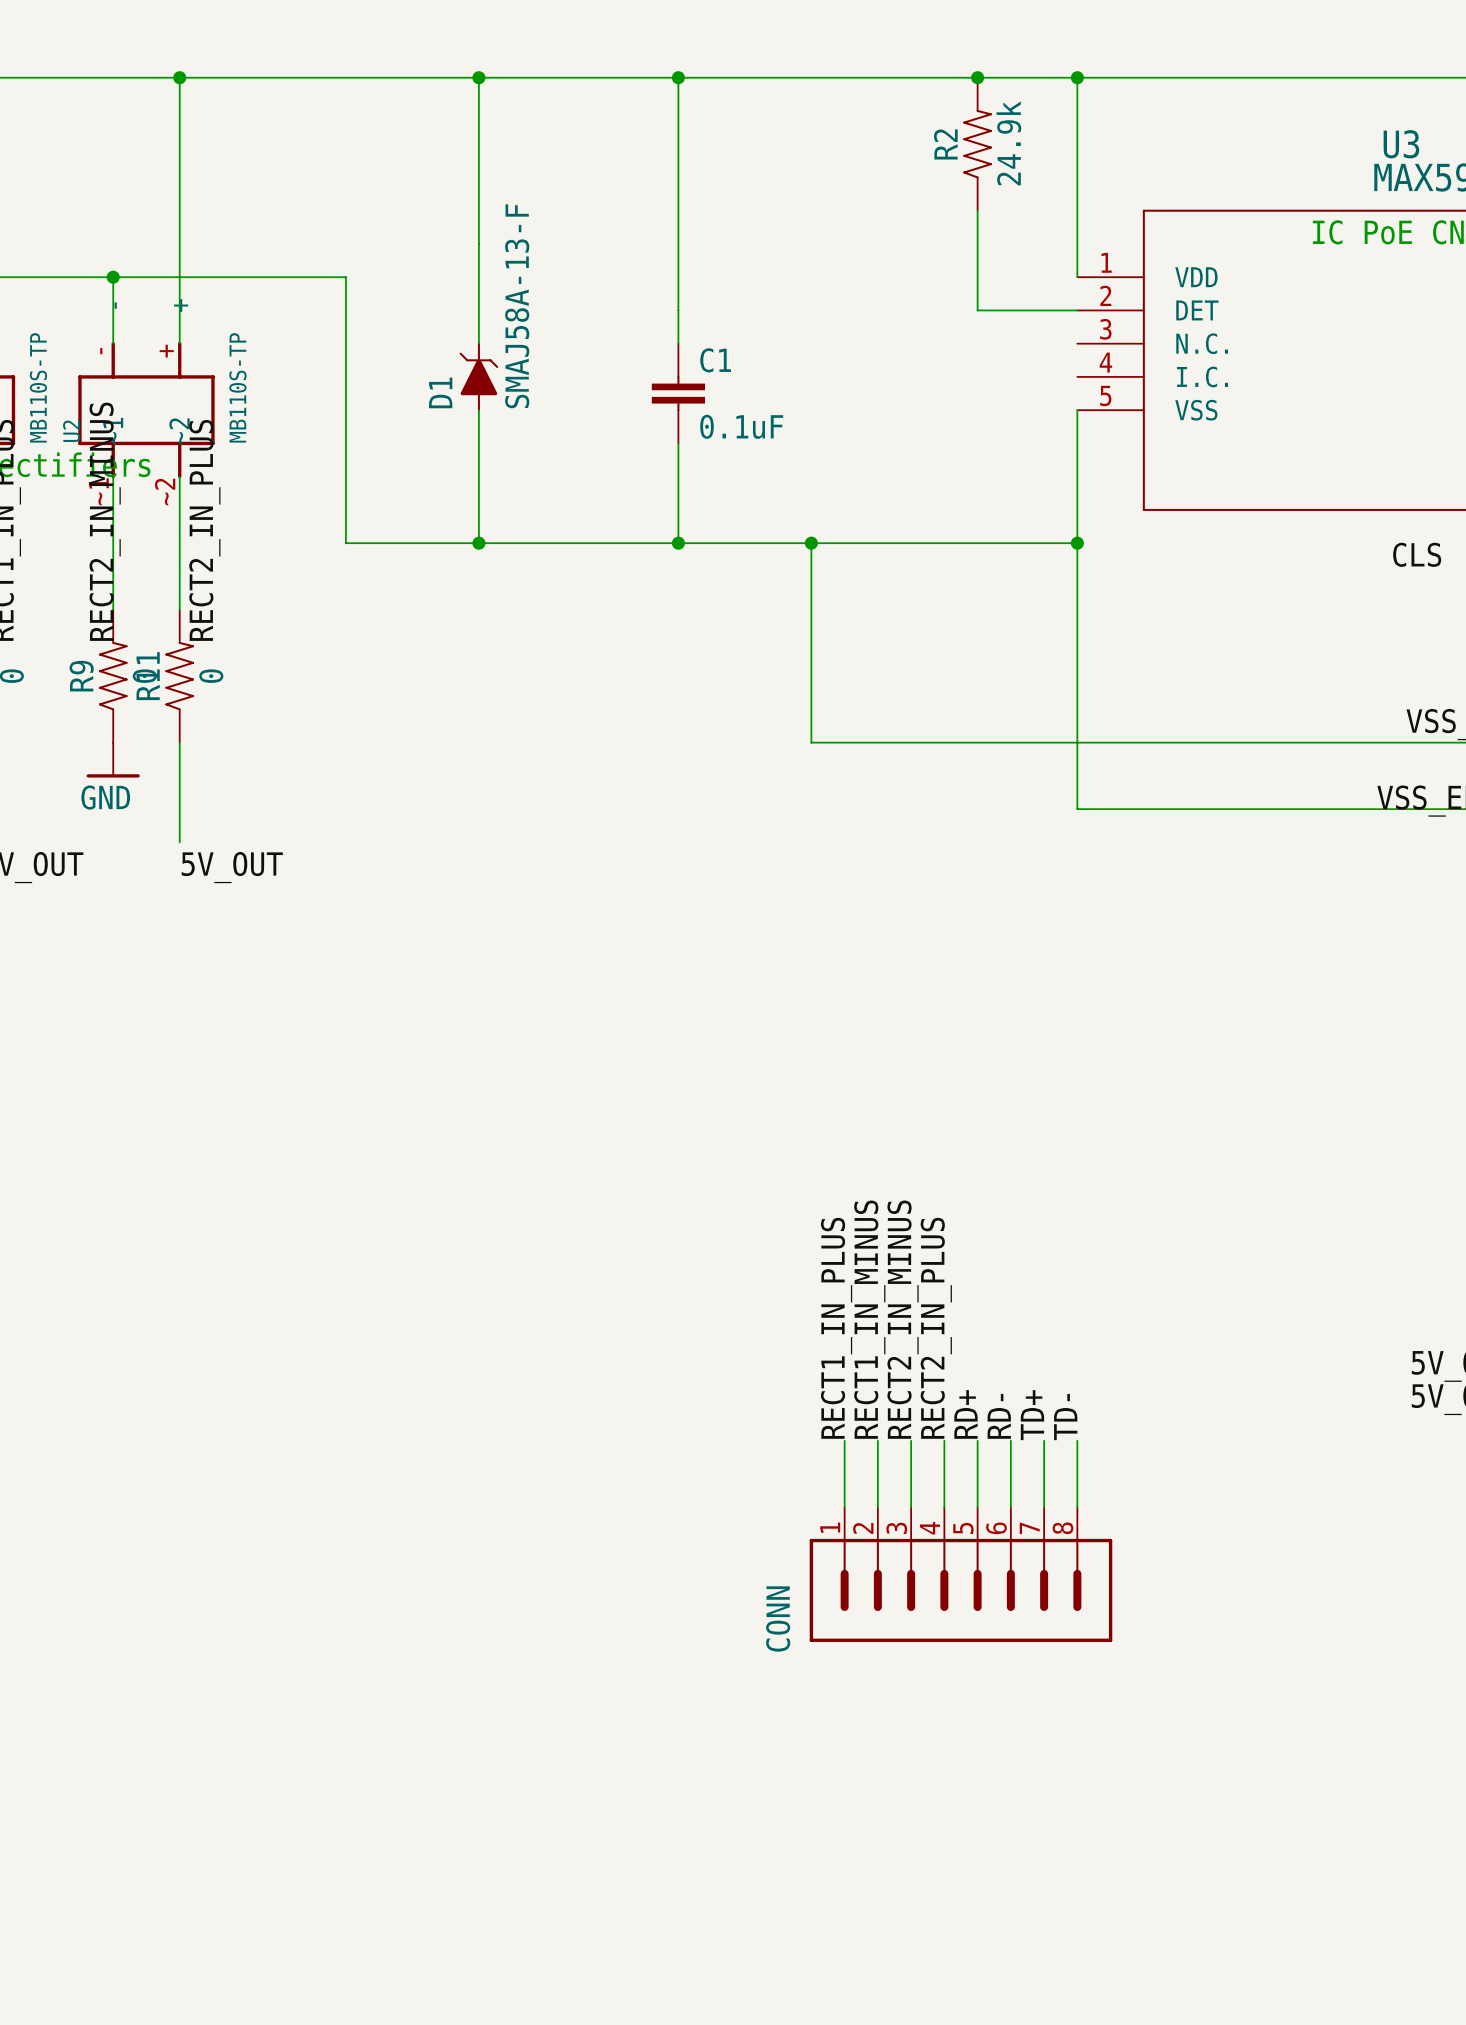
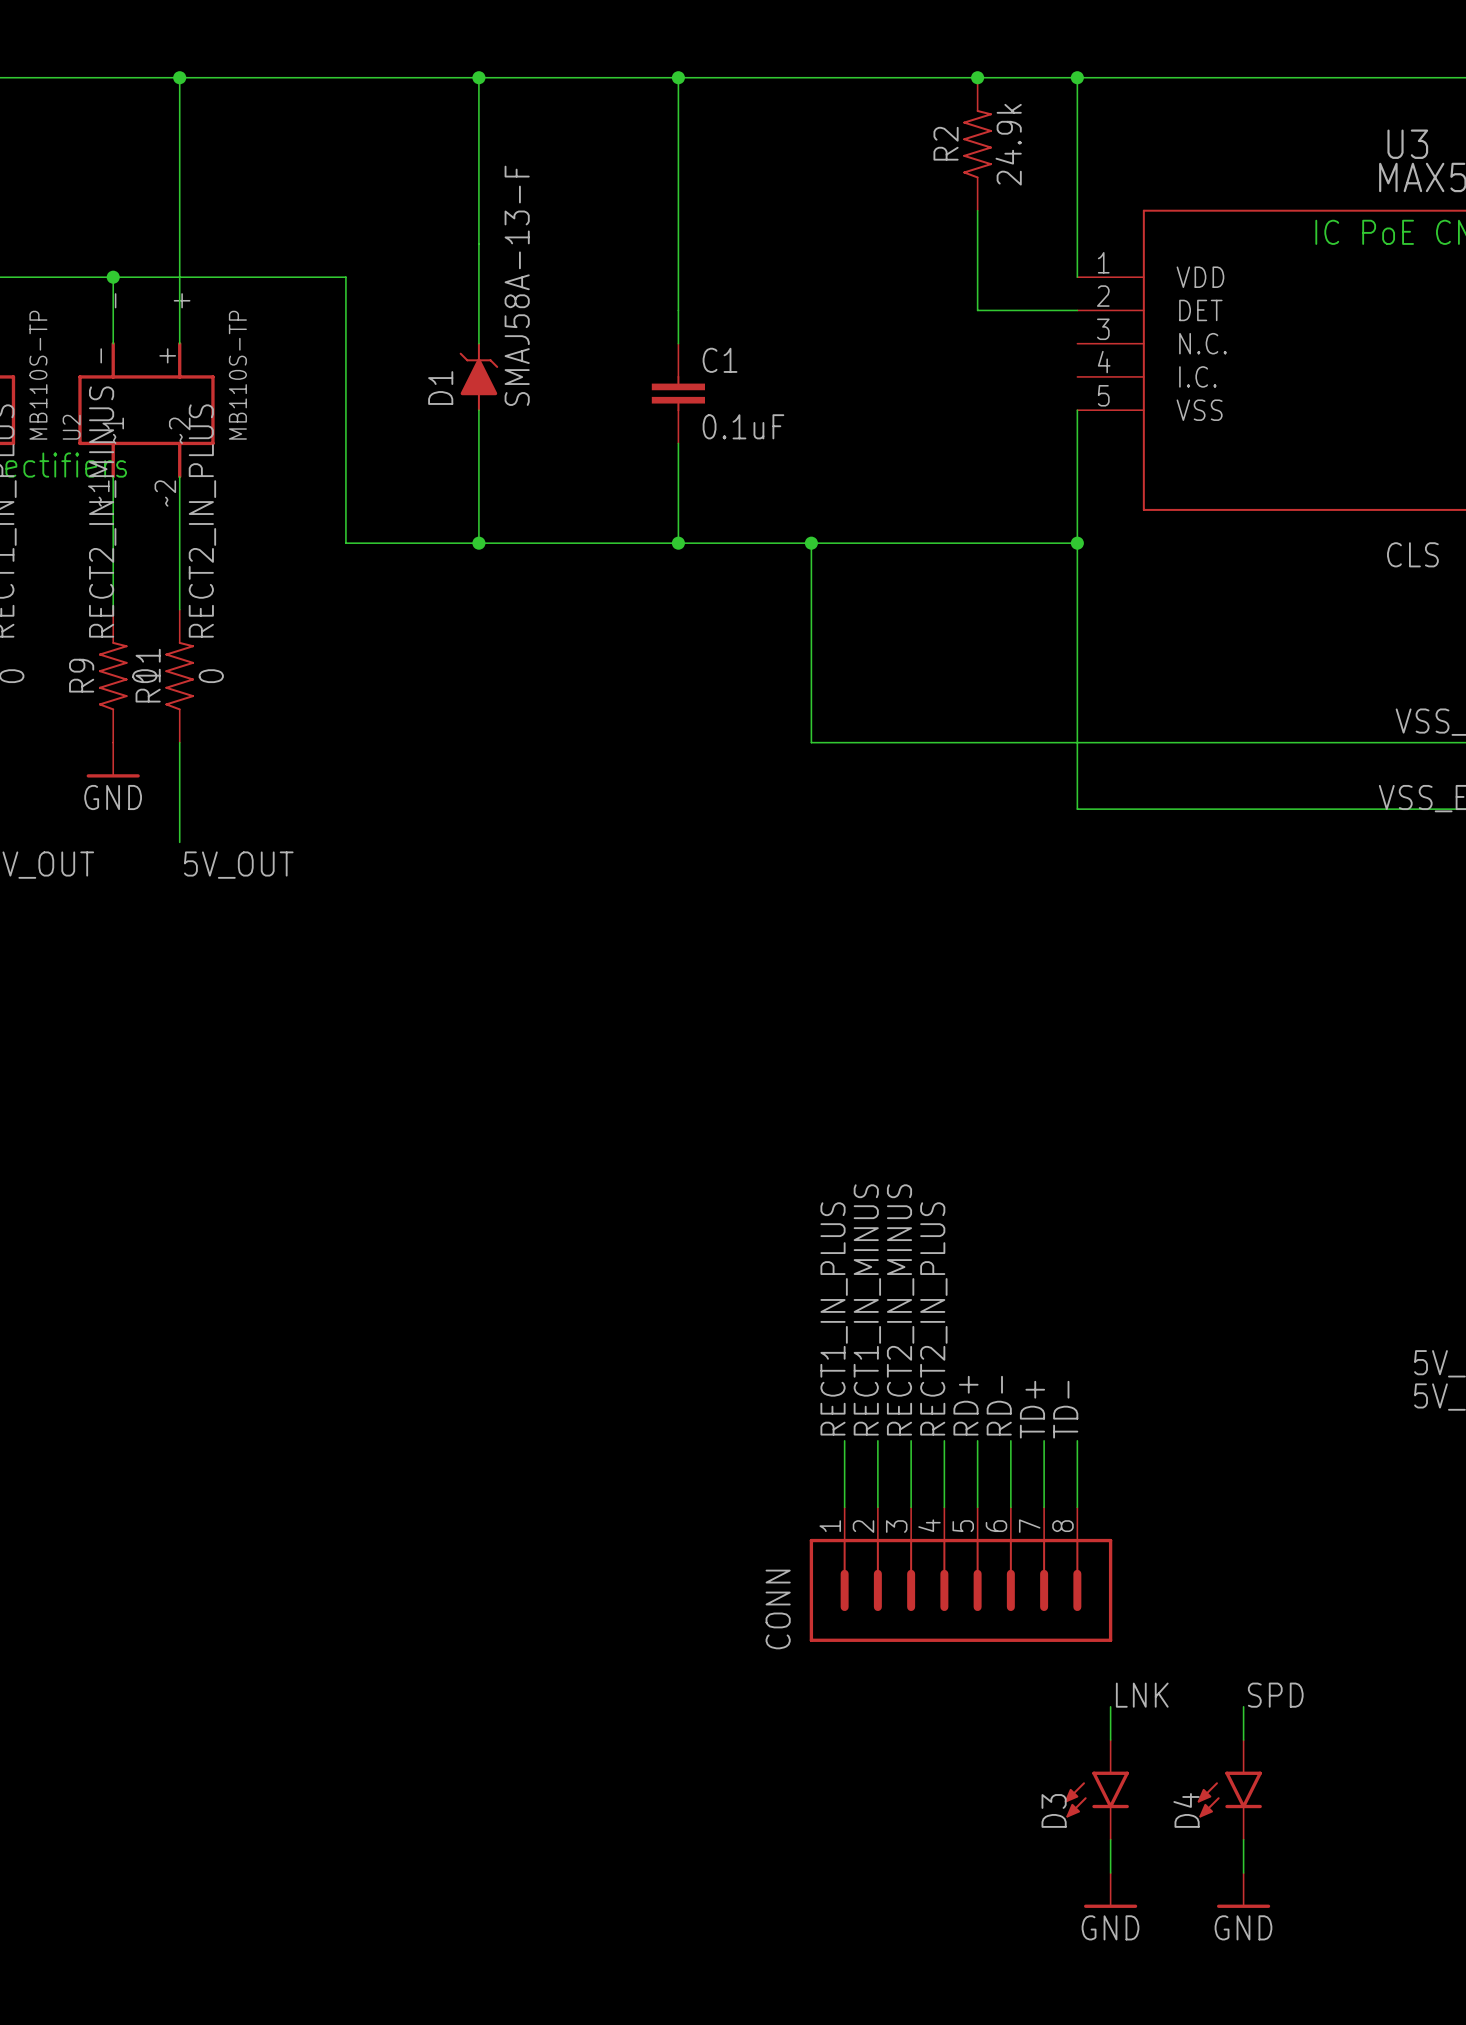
label: none -> LNK (1142, 1695)
label: none -> SPD (1275, 1695)
wire: none -> (1110, 1706) (1110, 1740)
wire: none -> (1243, 1706) (1243, 1740)
D3: none -> (1096, 1789)
D4: none -> (1229, 1789)
wire: none -> (1110, 1839) (1110, 1873)
wire: none -> (1243, 1839) (1243, 1873)
power symbol: none -> GND (1110, 1890)
power symbol: none -> GND (1243, 1890)

